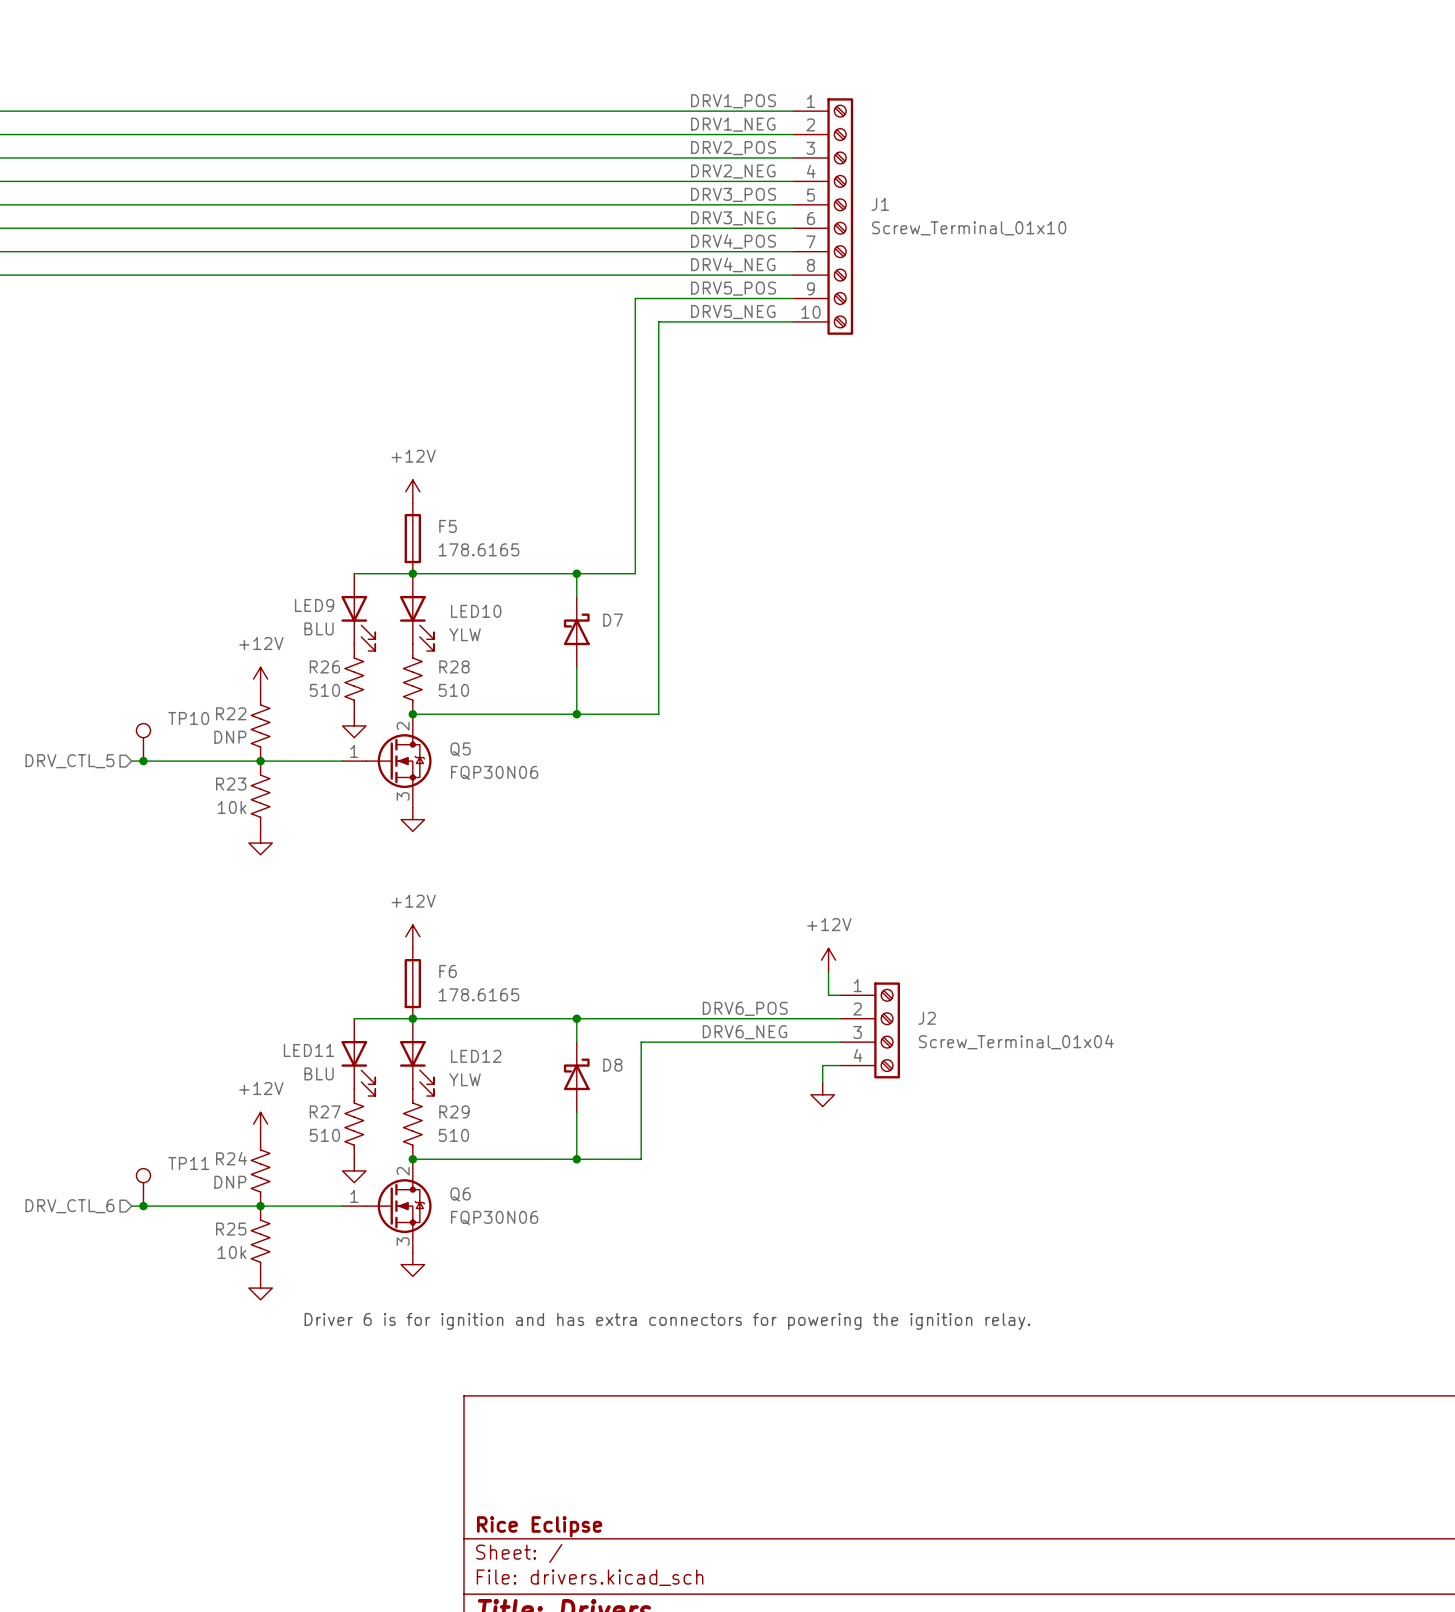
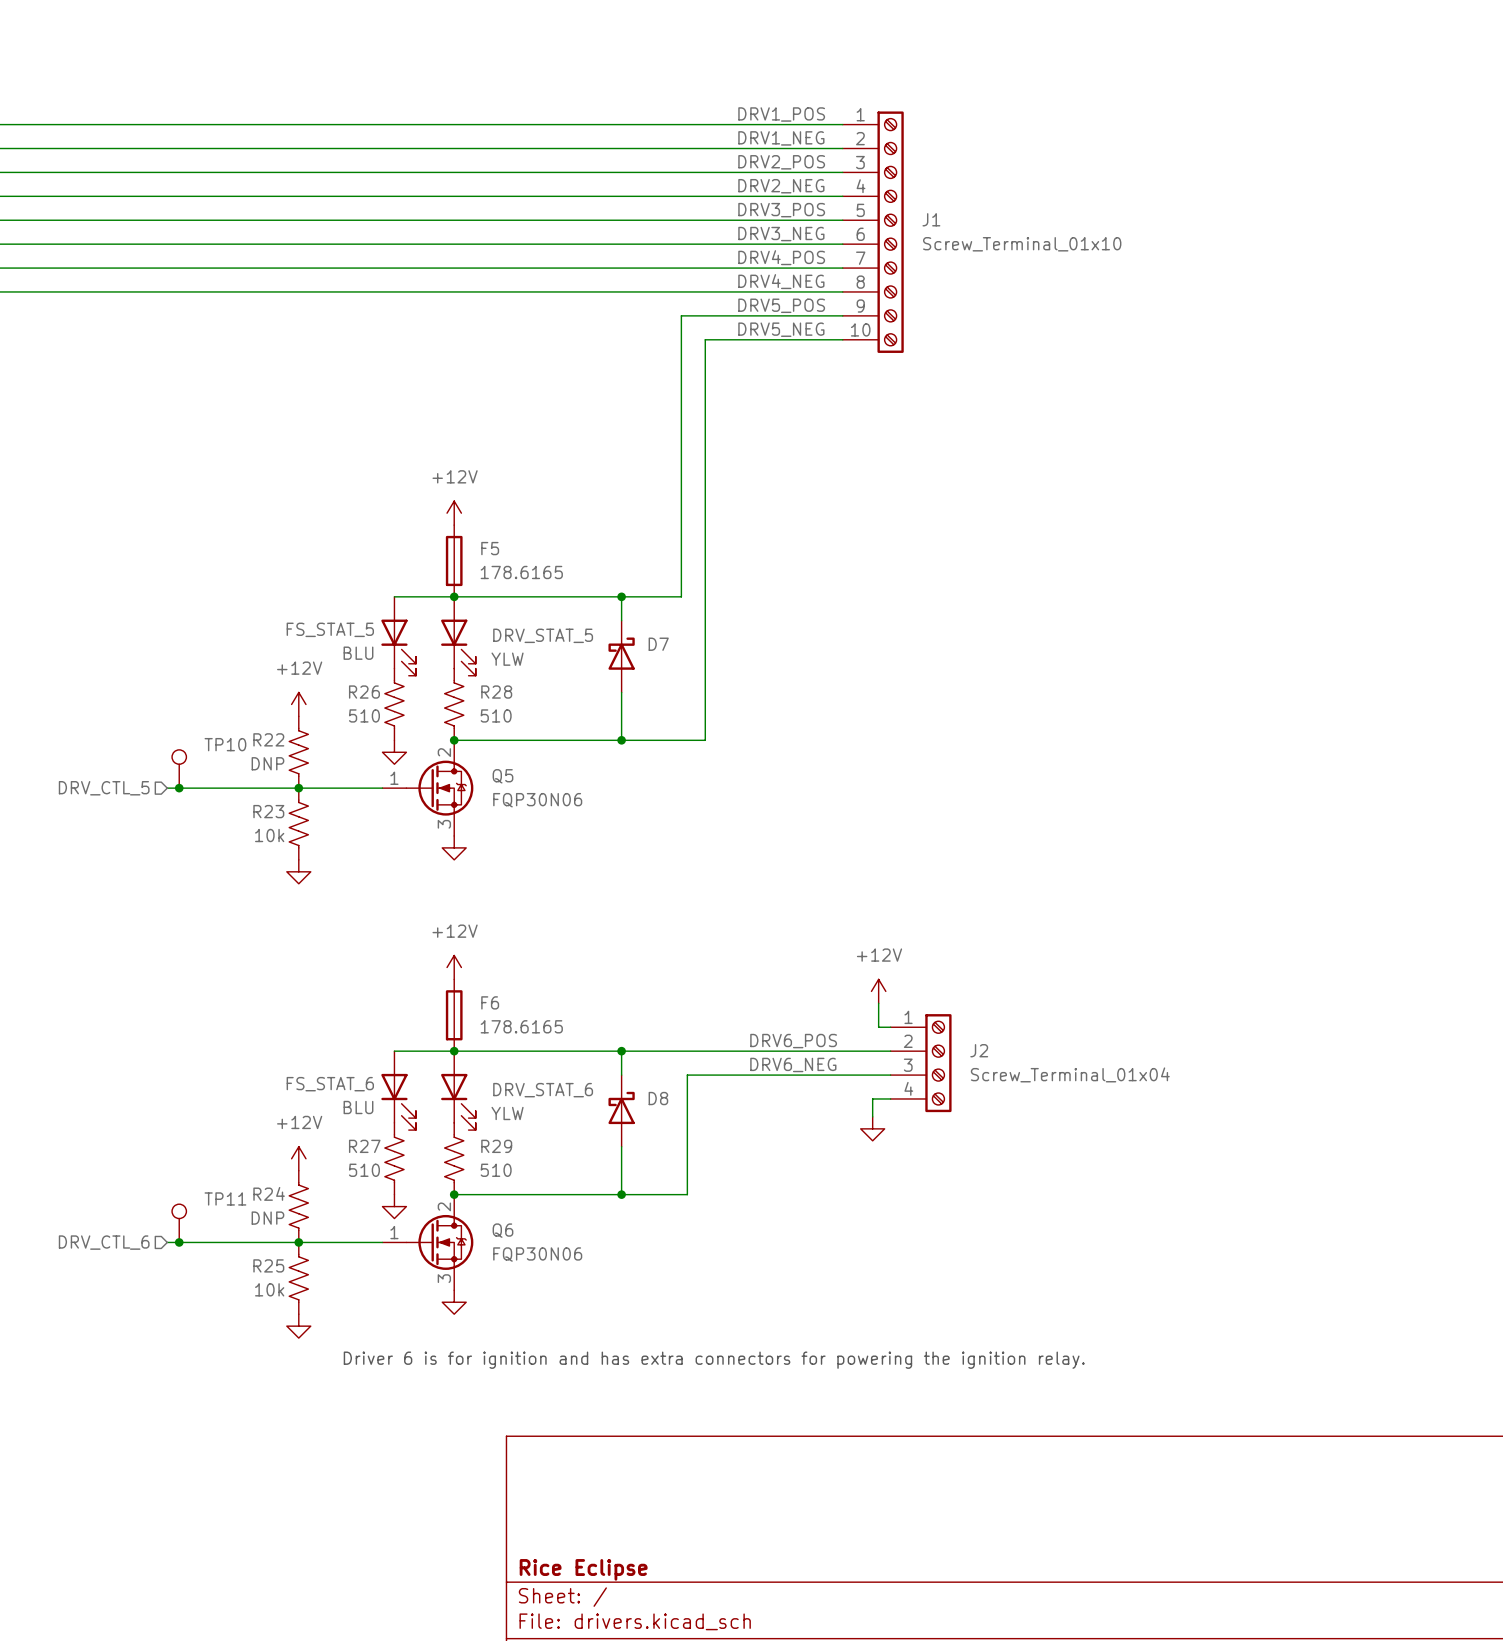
LED9 name: LED9 (314, 605) -> FS_STAT_5 (330, 629)
LED10 name: LED10 (476, 611) -> DRV_STAT_5 (543, 635)
LED11 name: LED11 (309, 1050) -> FS_STAT_6 (330, 1084)
LED12 name: LED12 (476, 1056) -> DRV_STAT_6 (543, 1090)

